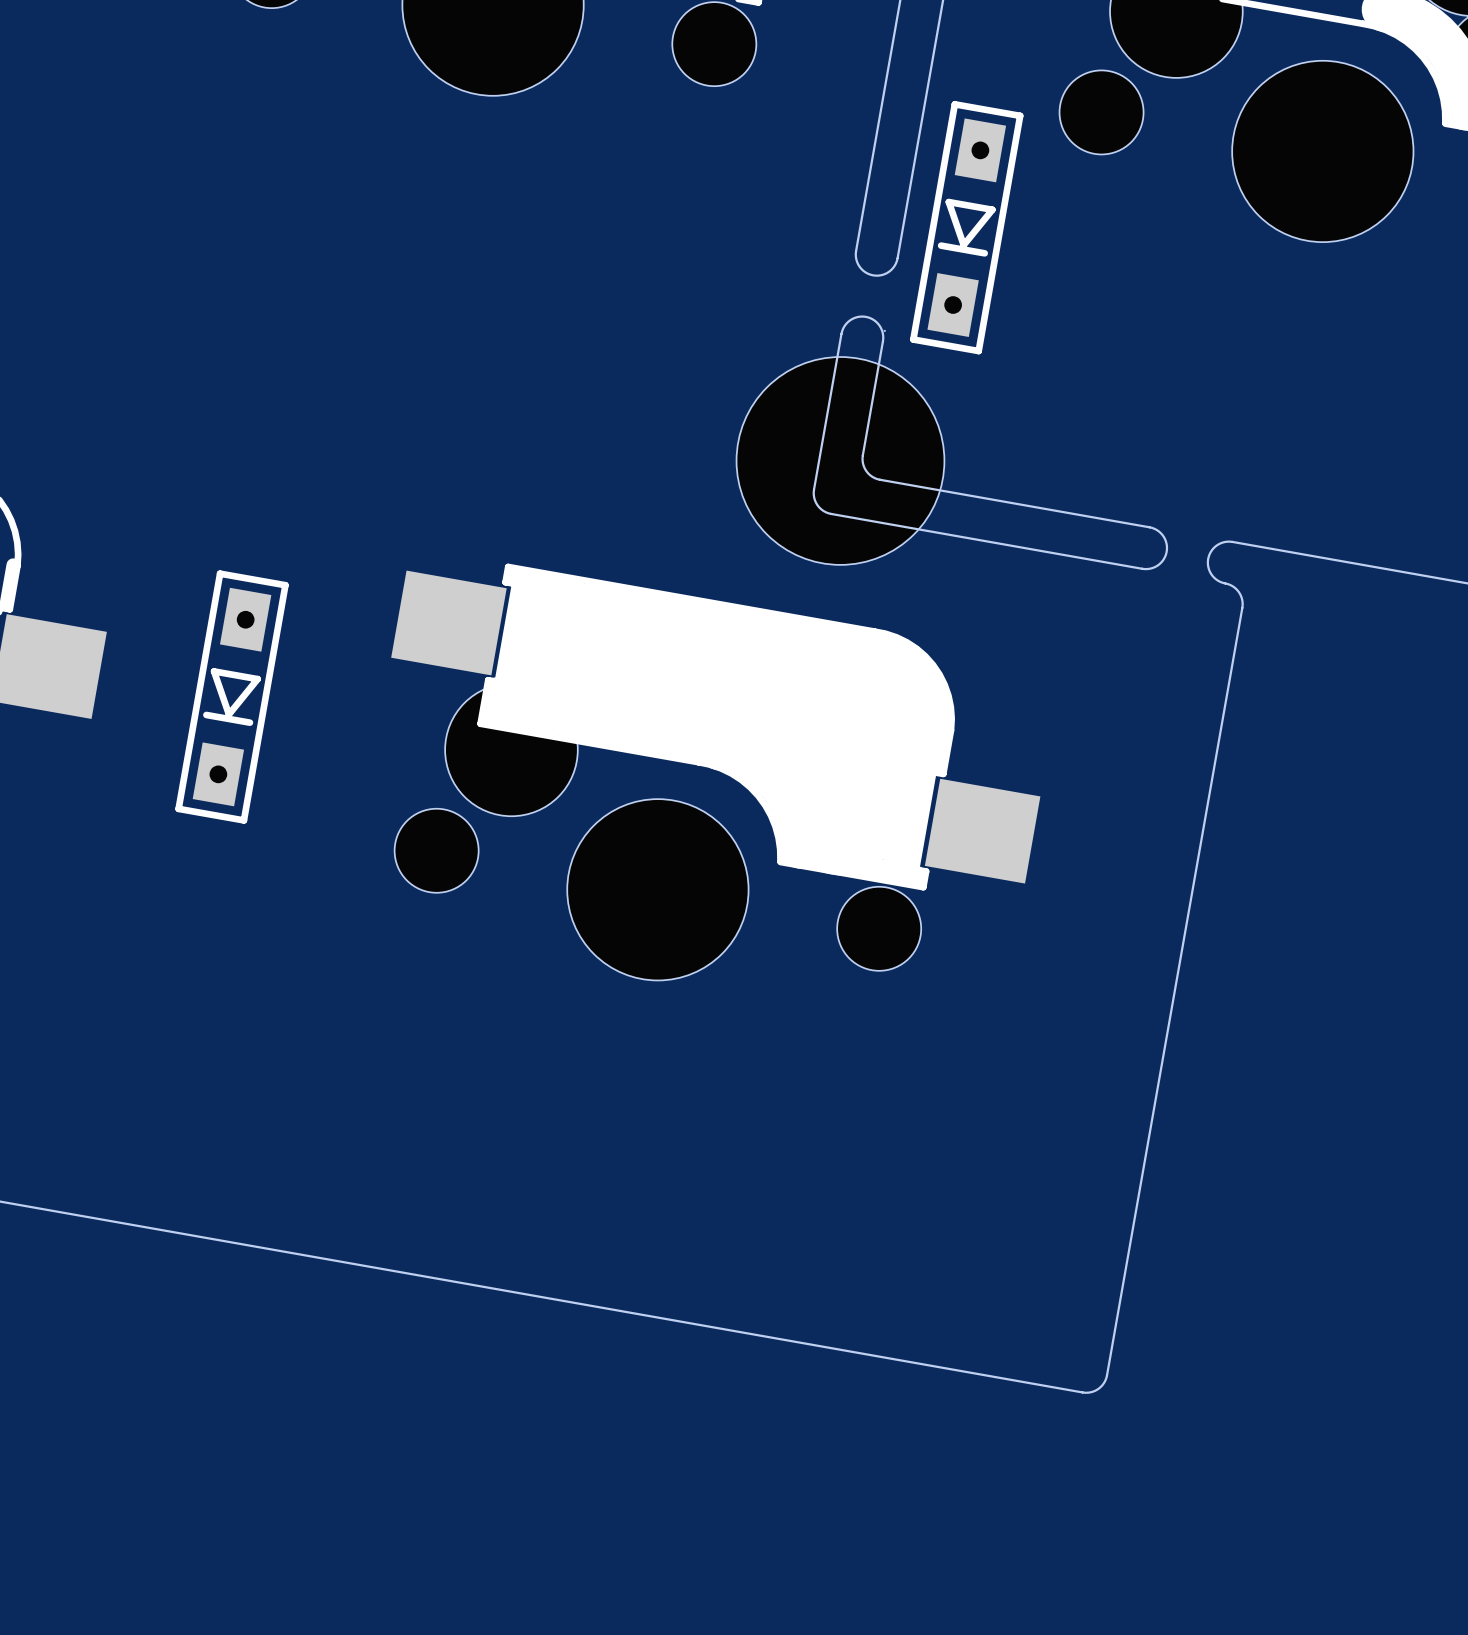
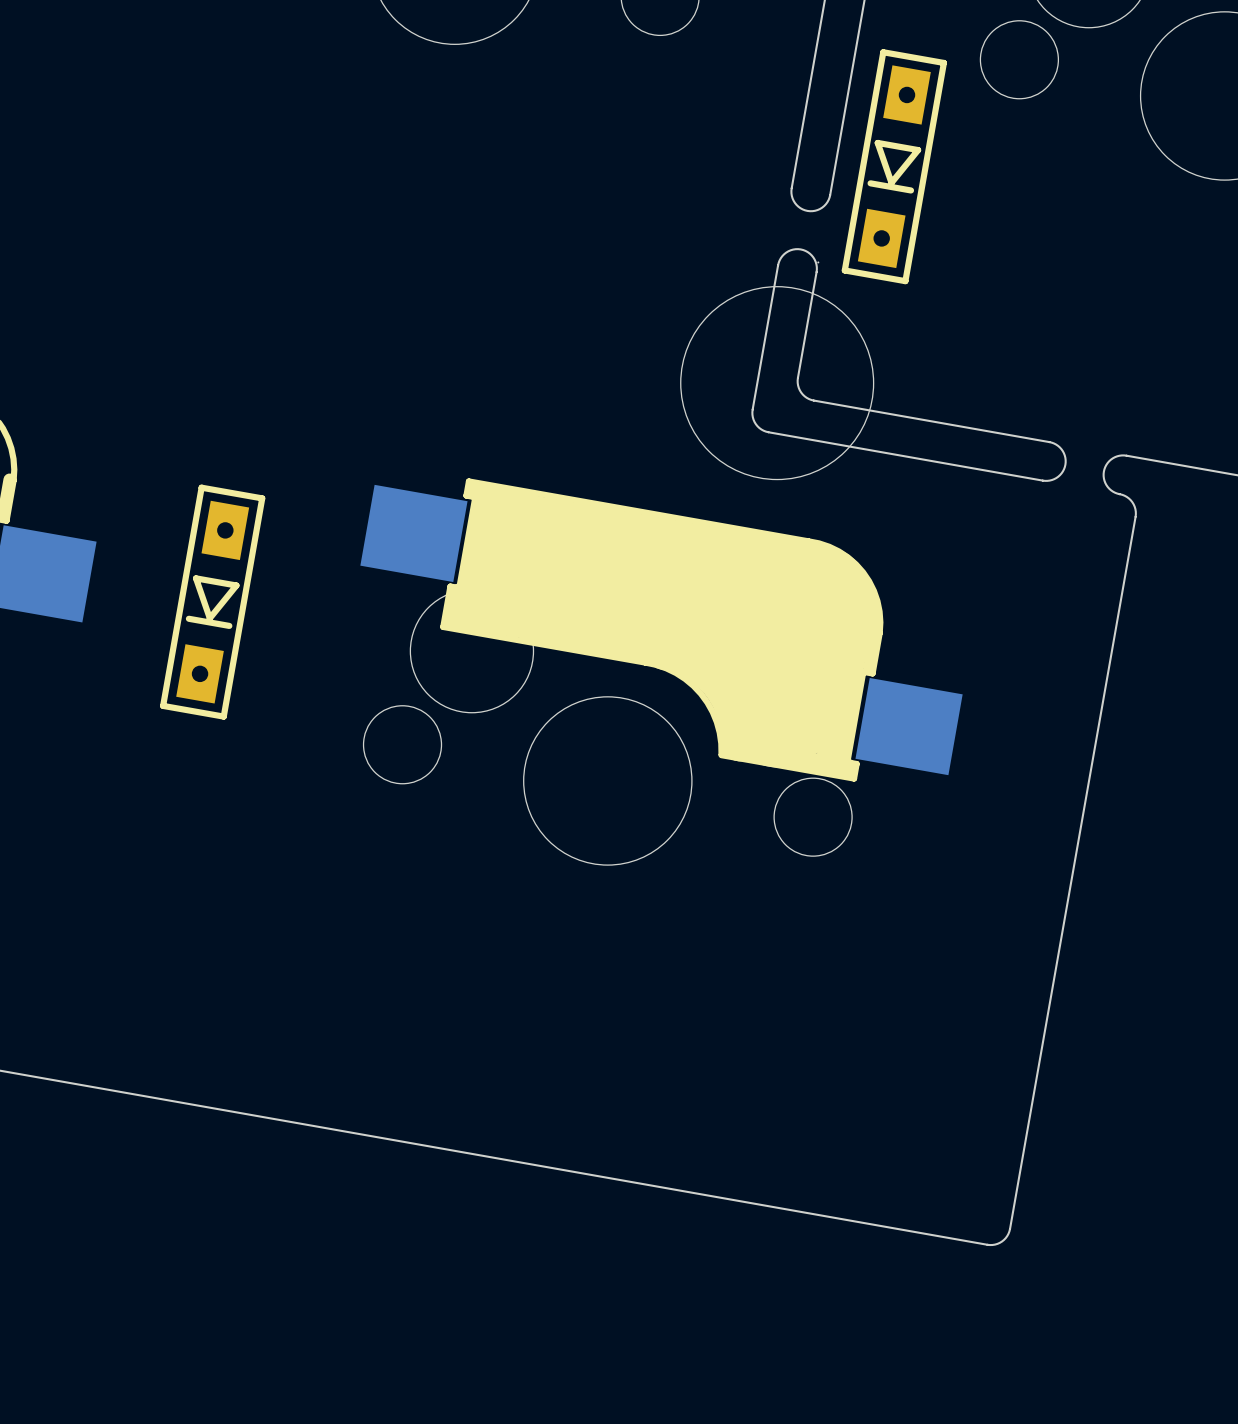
board edge: (1134, 524) (1152, 527) (1158, 531) (1166, 541) (1166, 551) (1160, 562) (1152, 568) (1144, 569) (1126, 566) -> (1049, 442) (1058, 445) (1062, 451) (1065, 464) (1061, 473) (1056, 478) (1042, 480)
board edge: (1232, 541) (1224, 541) (1215, 546) (1208, 559) (1208, 569) (1214, 577) (1232, 586) (1238, 592) (1242, 599) (1242, 607) (1107, 1375) (1102, 1385) (1093, 1391) (1085, 1392) (1067, 1389) -> (1140, 458) (1117, 456) (1109, 461) (1103, 471) (1104, 480) (1109, 488) (1126, 496) (1132, 502) (1135, 516) (1010, 1228) (1002, 1241) (987, 1244)

